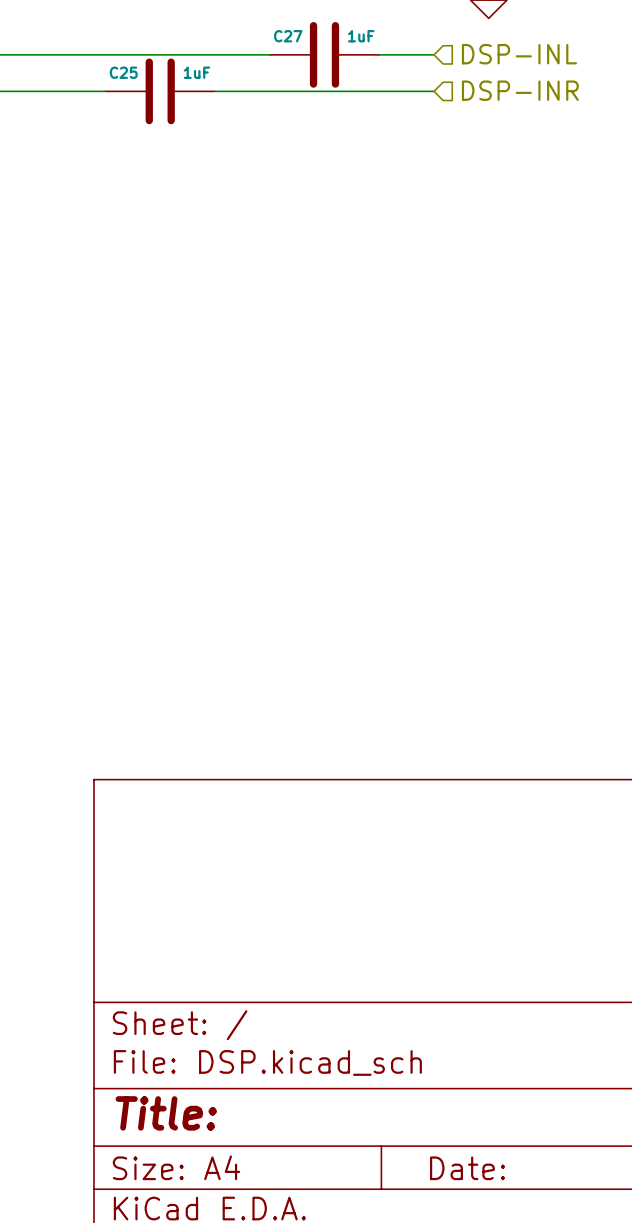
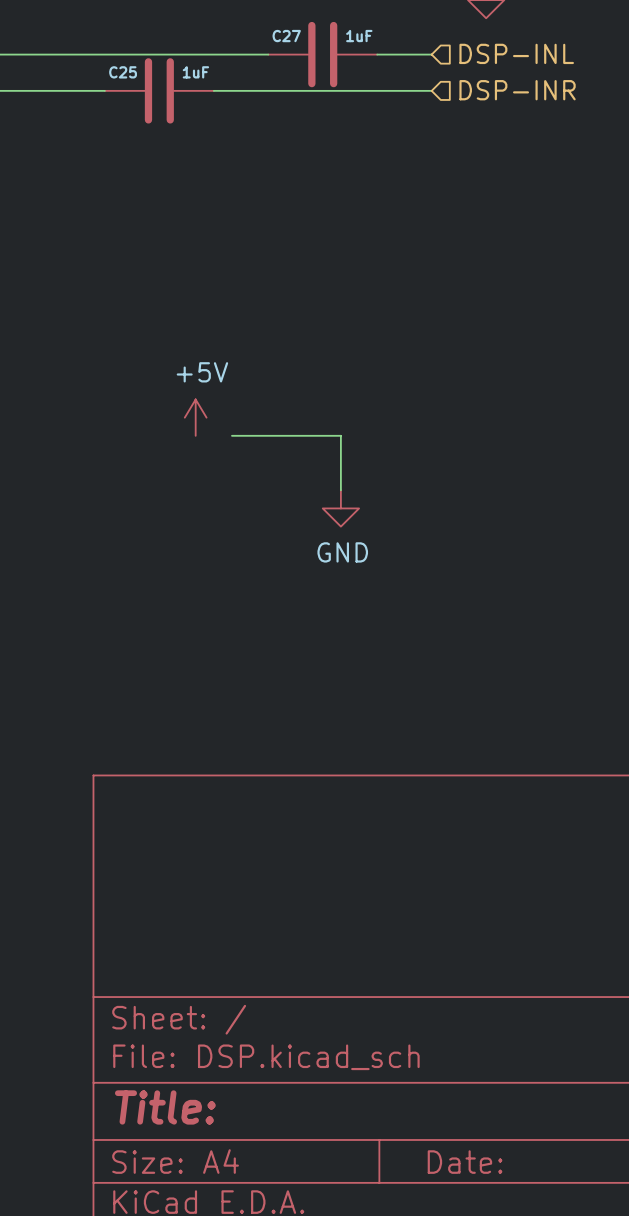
power symbol: none -> +5V (195, 417)
wire: none -> (231, 435) (340, 435) (340, 490)
power symbol: none -> GND (340, 508)

